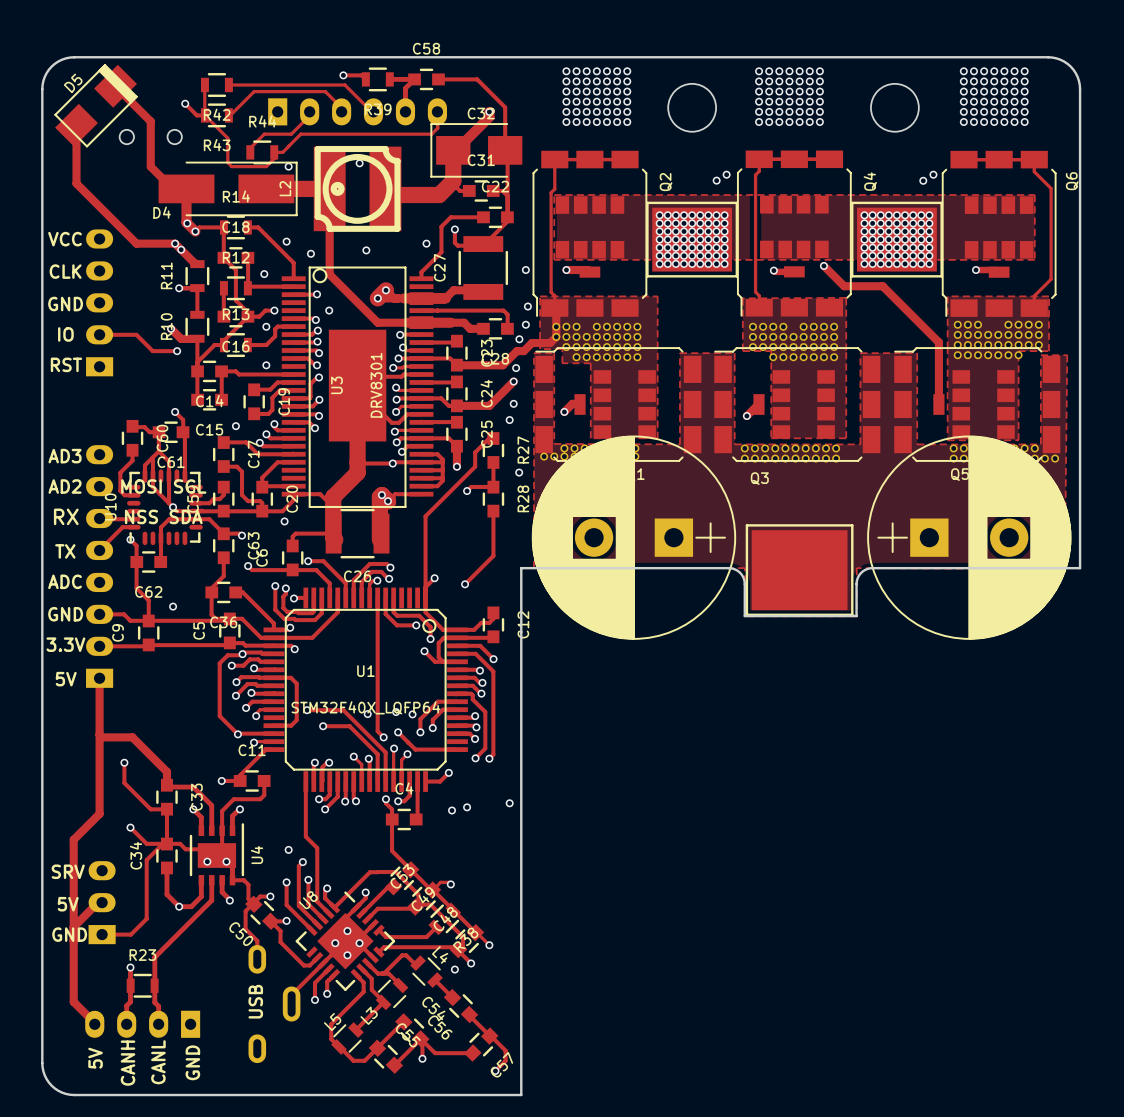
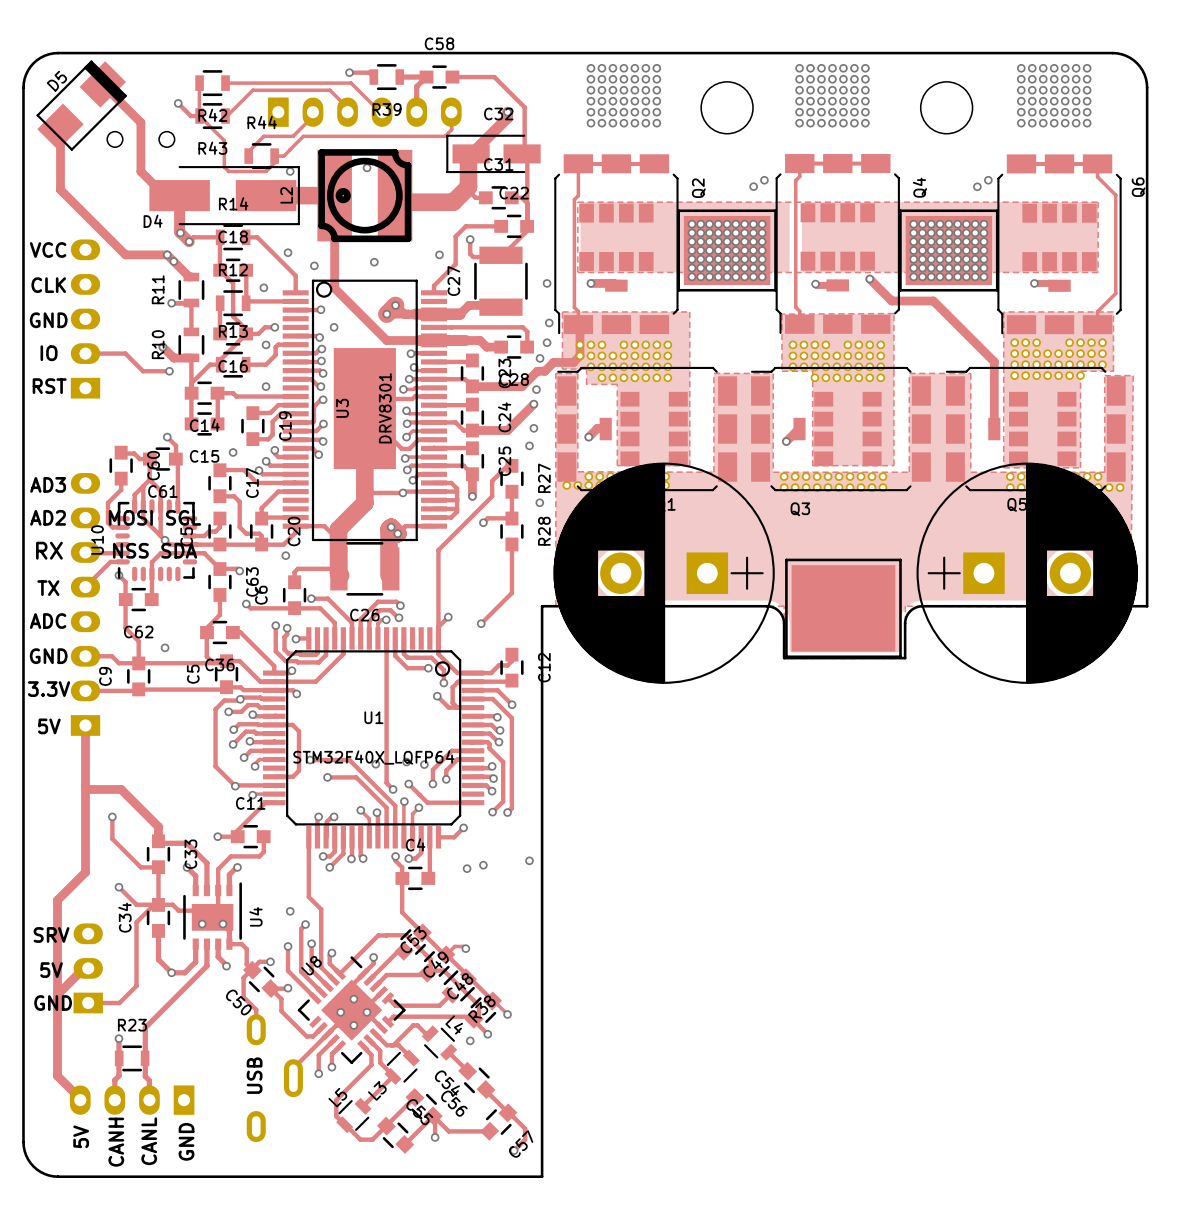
C32 footprint: [430, 123, 523, 178] -> [446, 134, 541, 174]

